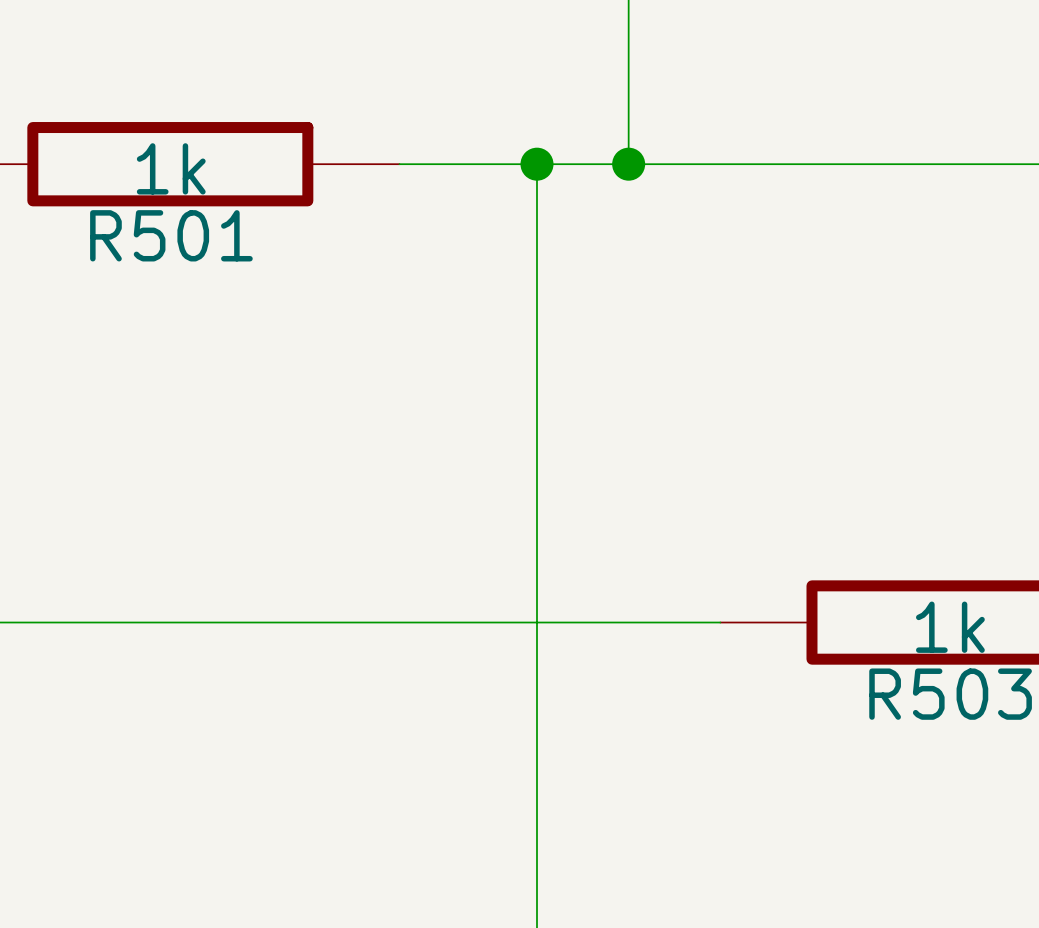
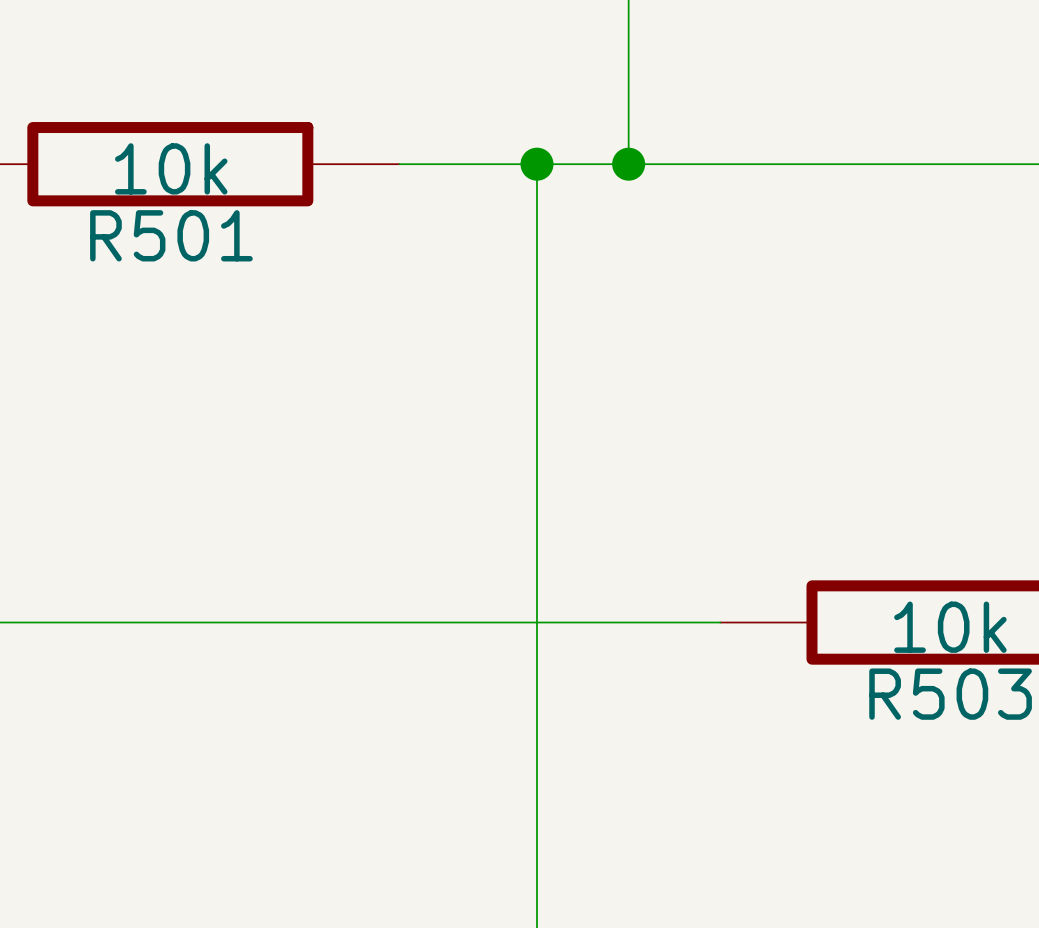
R501 value: 1k (171, 168) -> 10k (171, 168)
R503 value: 1k (950, 627) -> 10k (950, 627)

